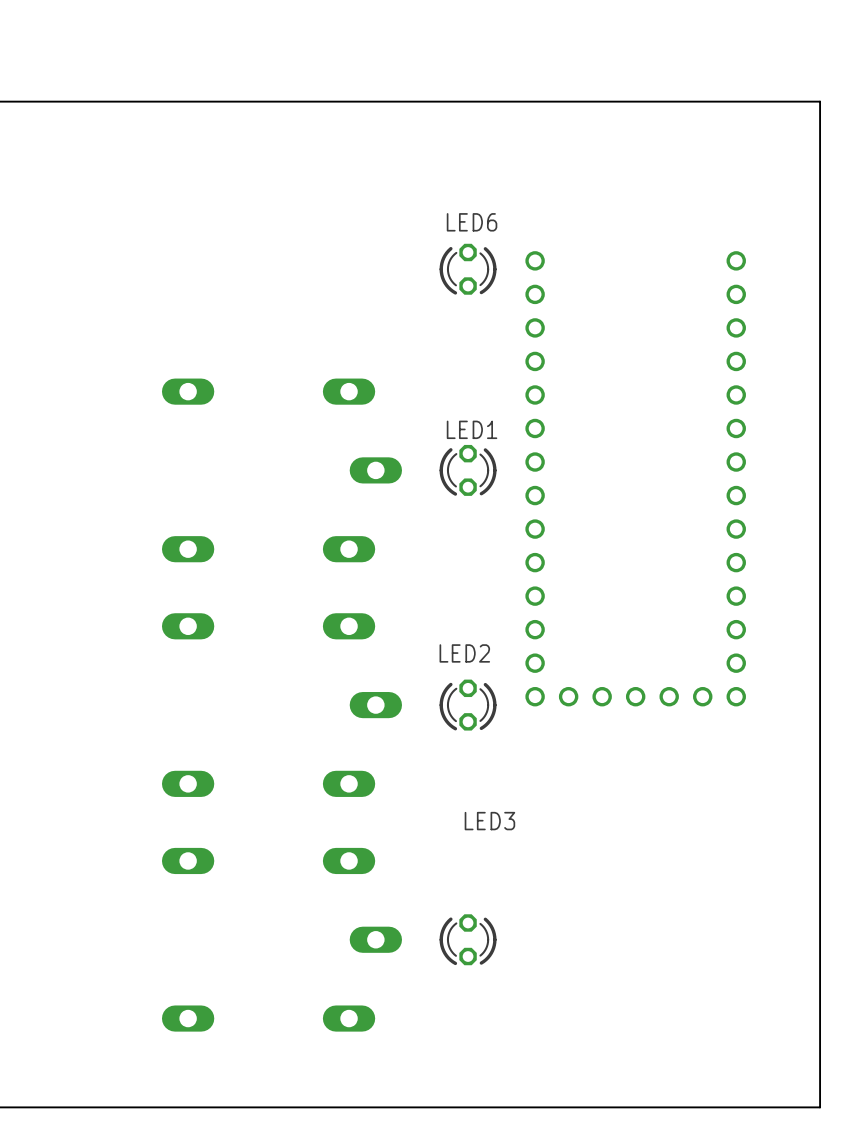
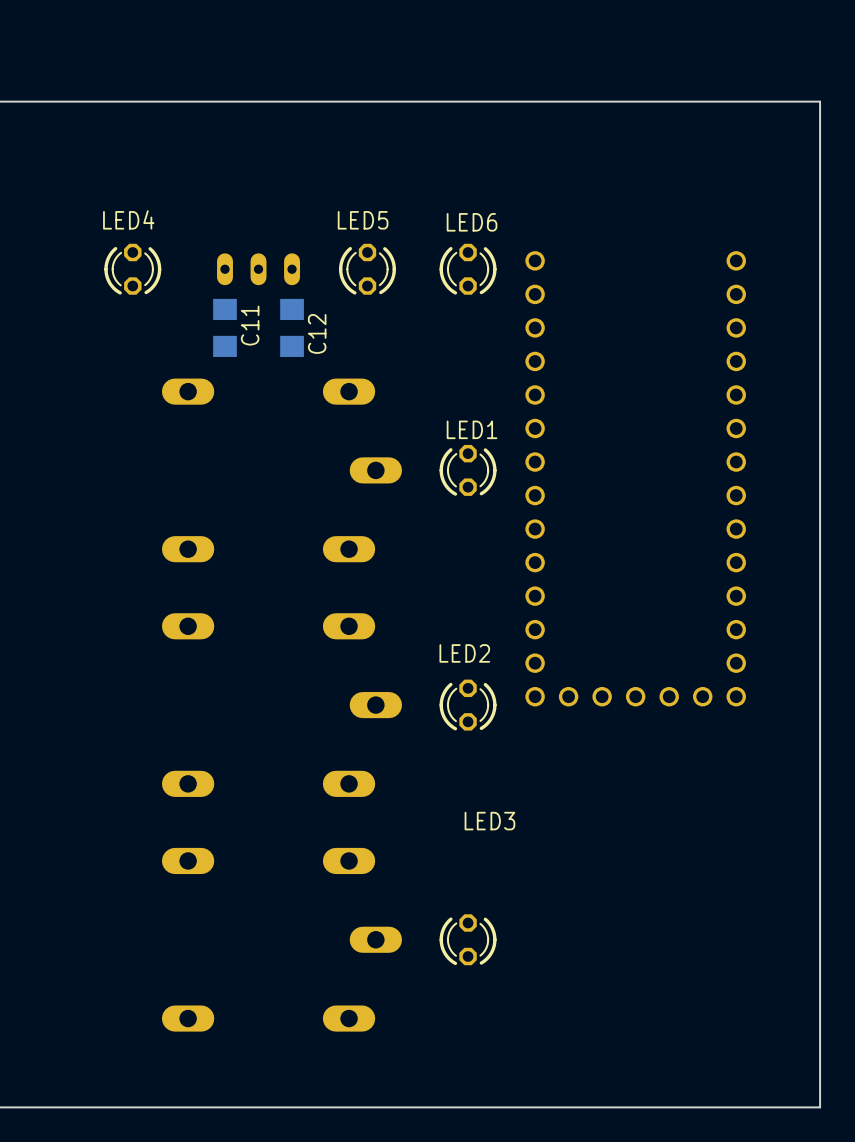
LED4: none -> (132, 269)
part: none -> (258, 269)
LED5: none -> (367, 269)
C11: none -> (224, 327)
C12: none -> (292, 327)

